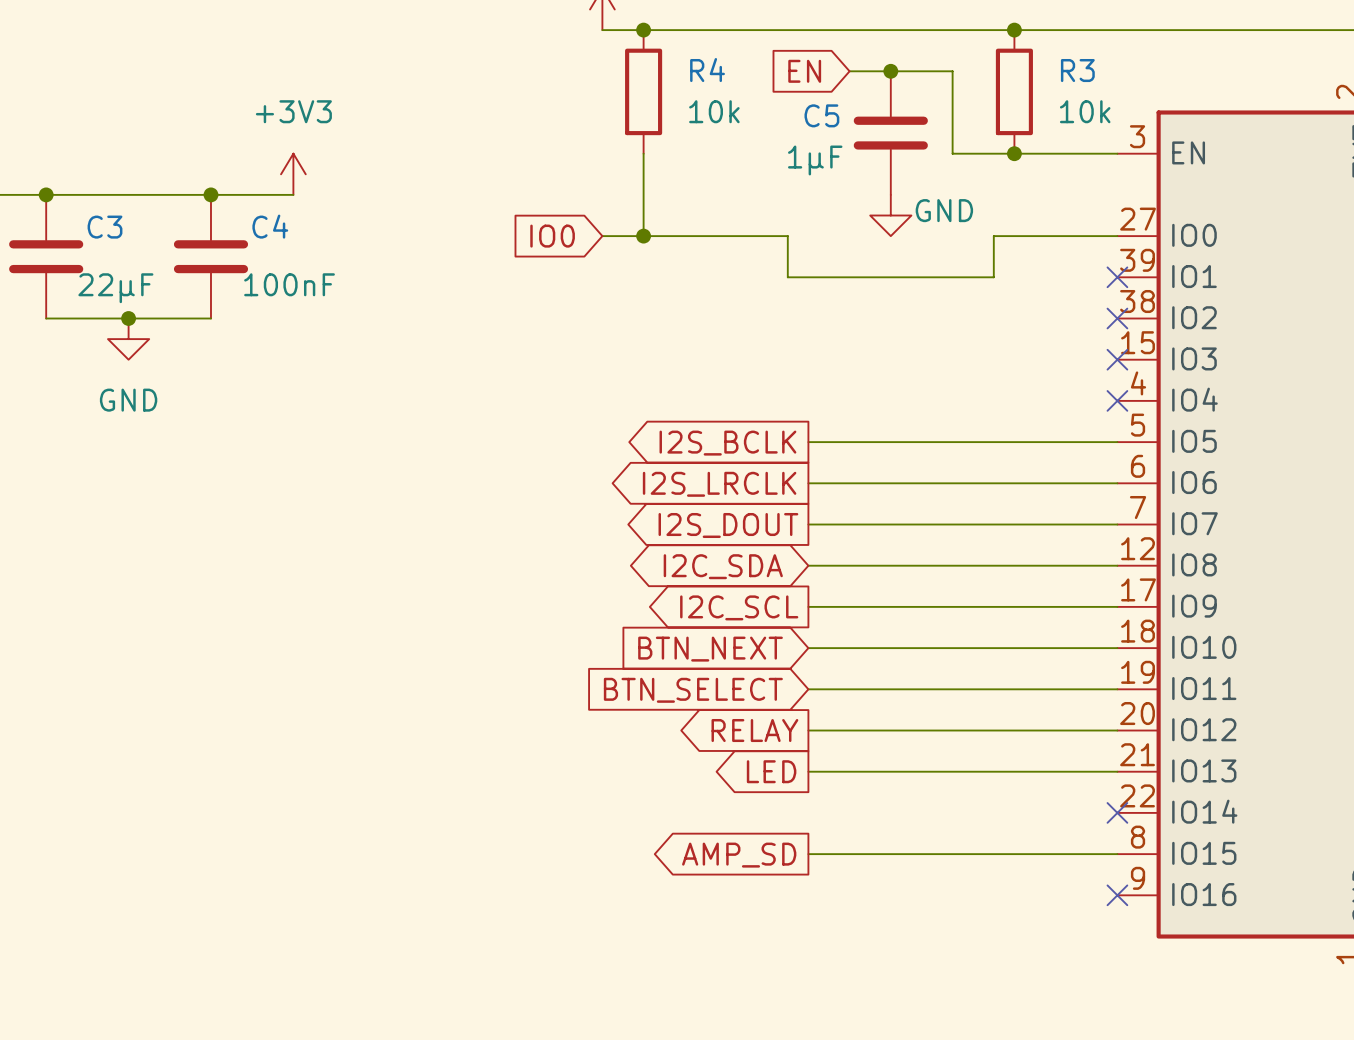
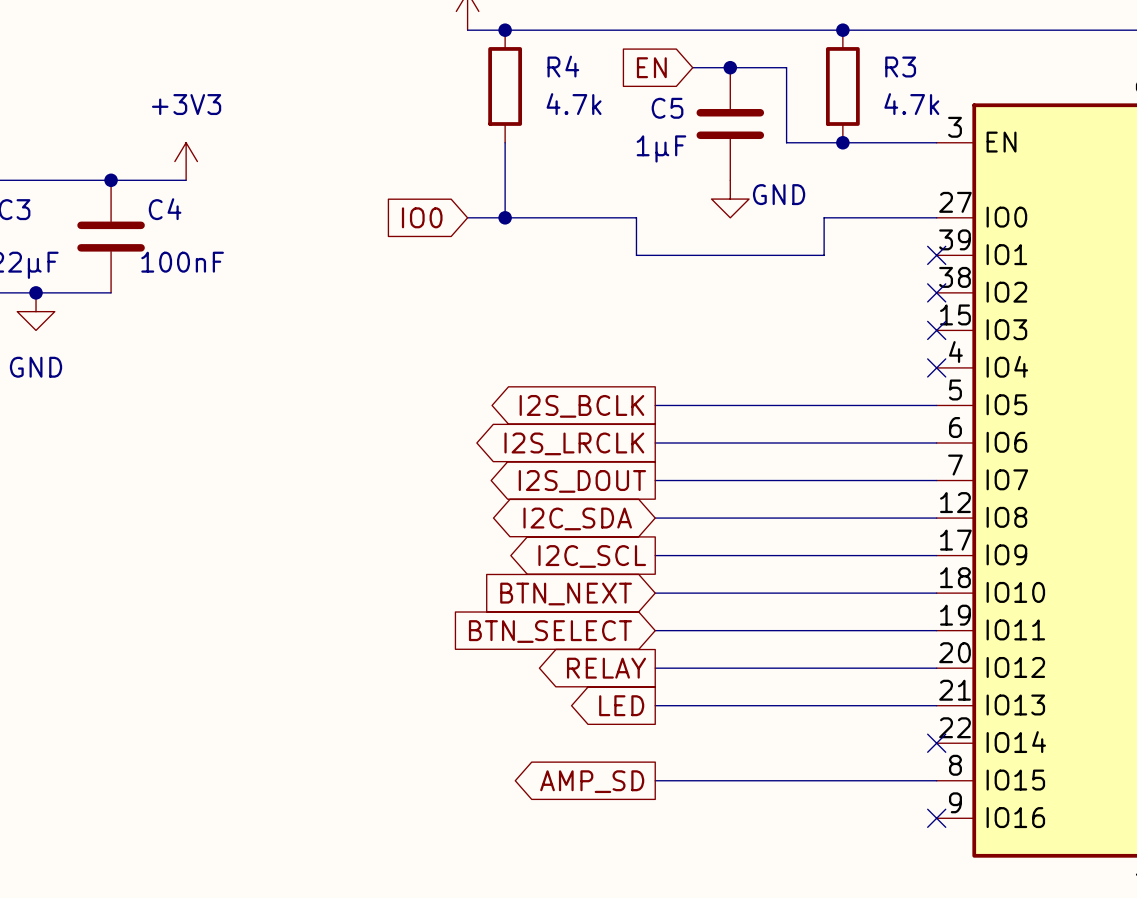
R4 value: 10k (714, 111) -> 4.7k (574, 104)
R3 value: 10k (1085, 111) -> 4.7k (911, 104)

